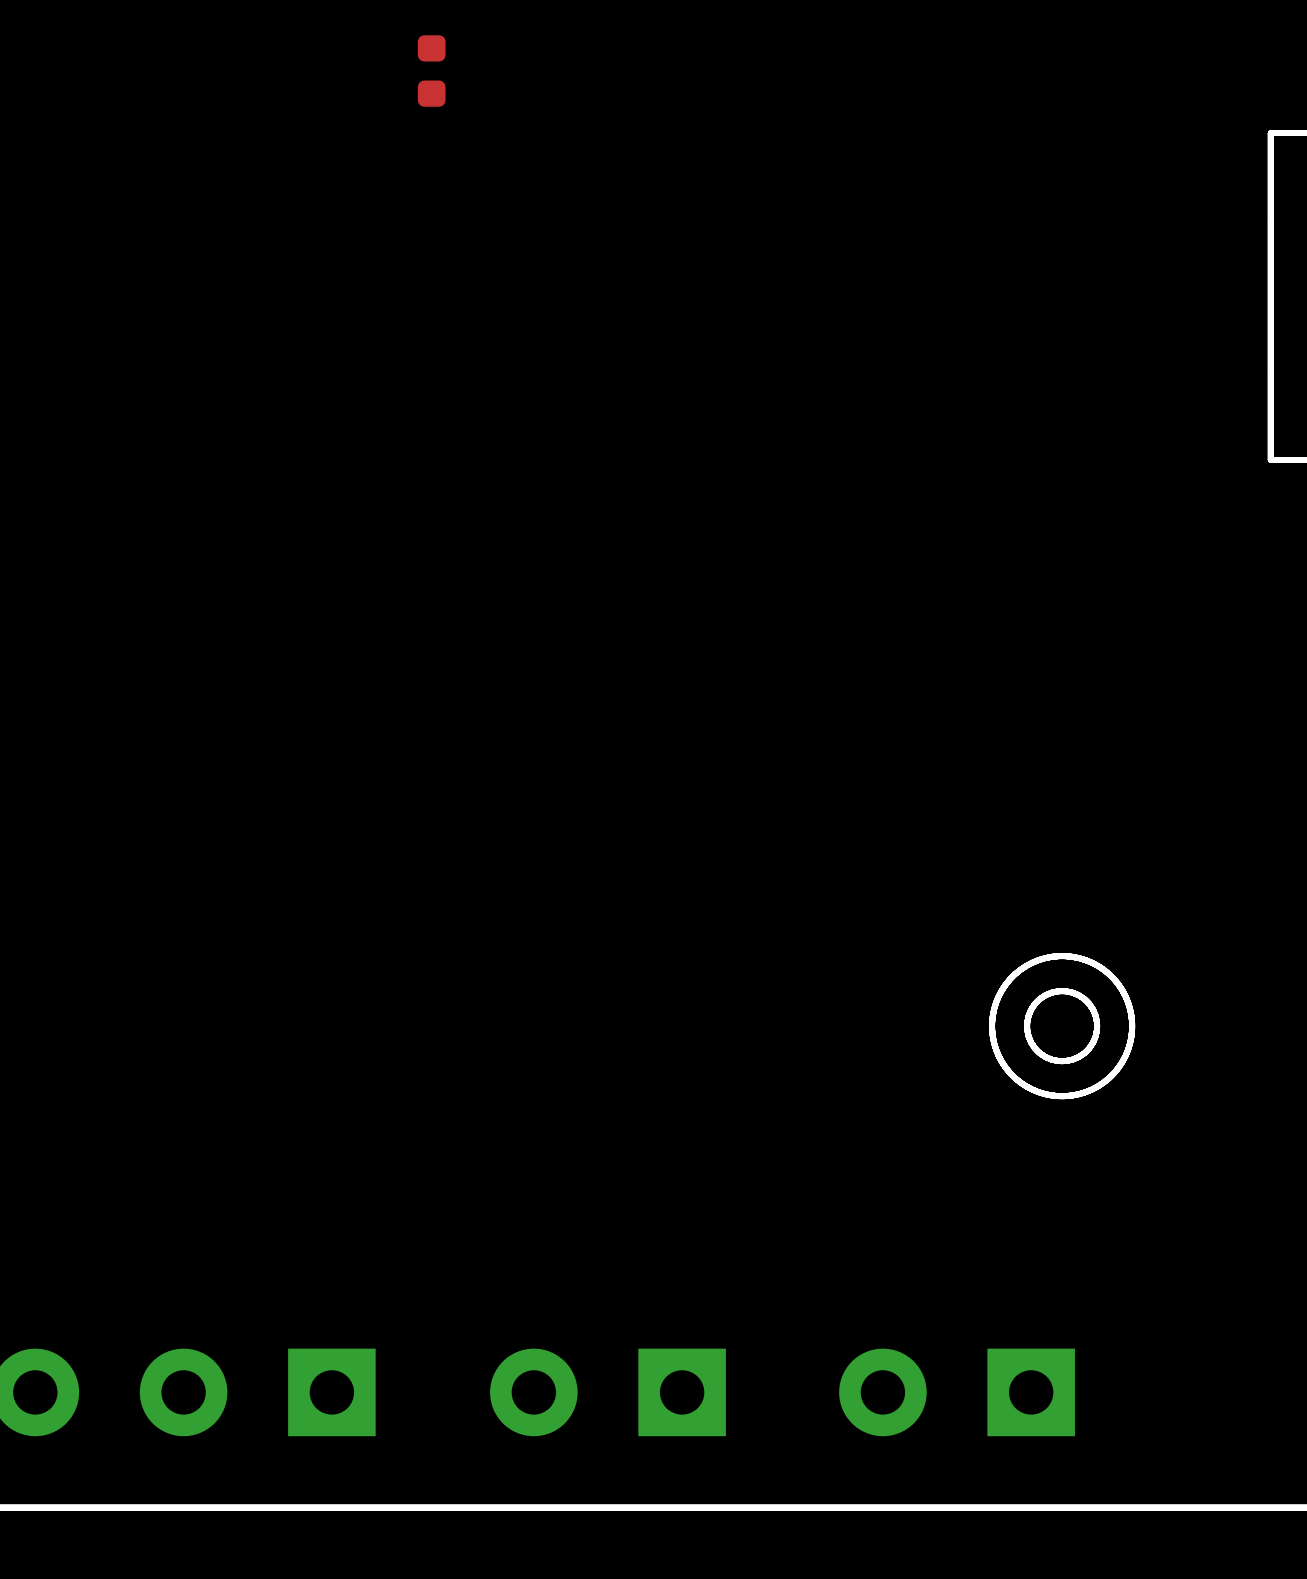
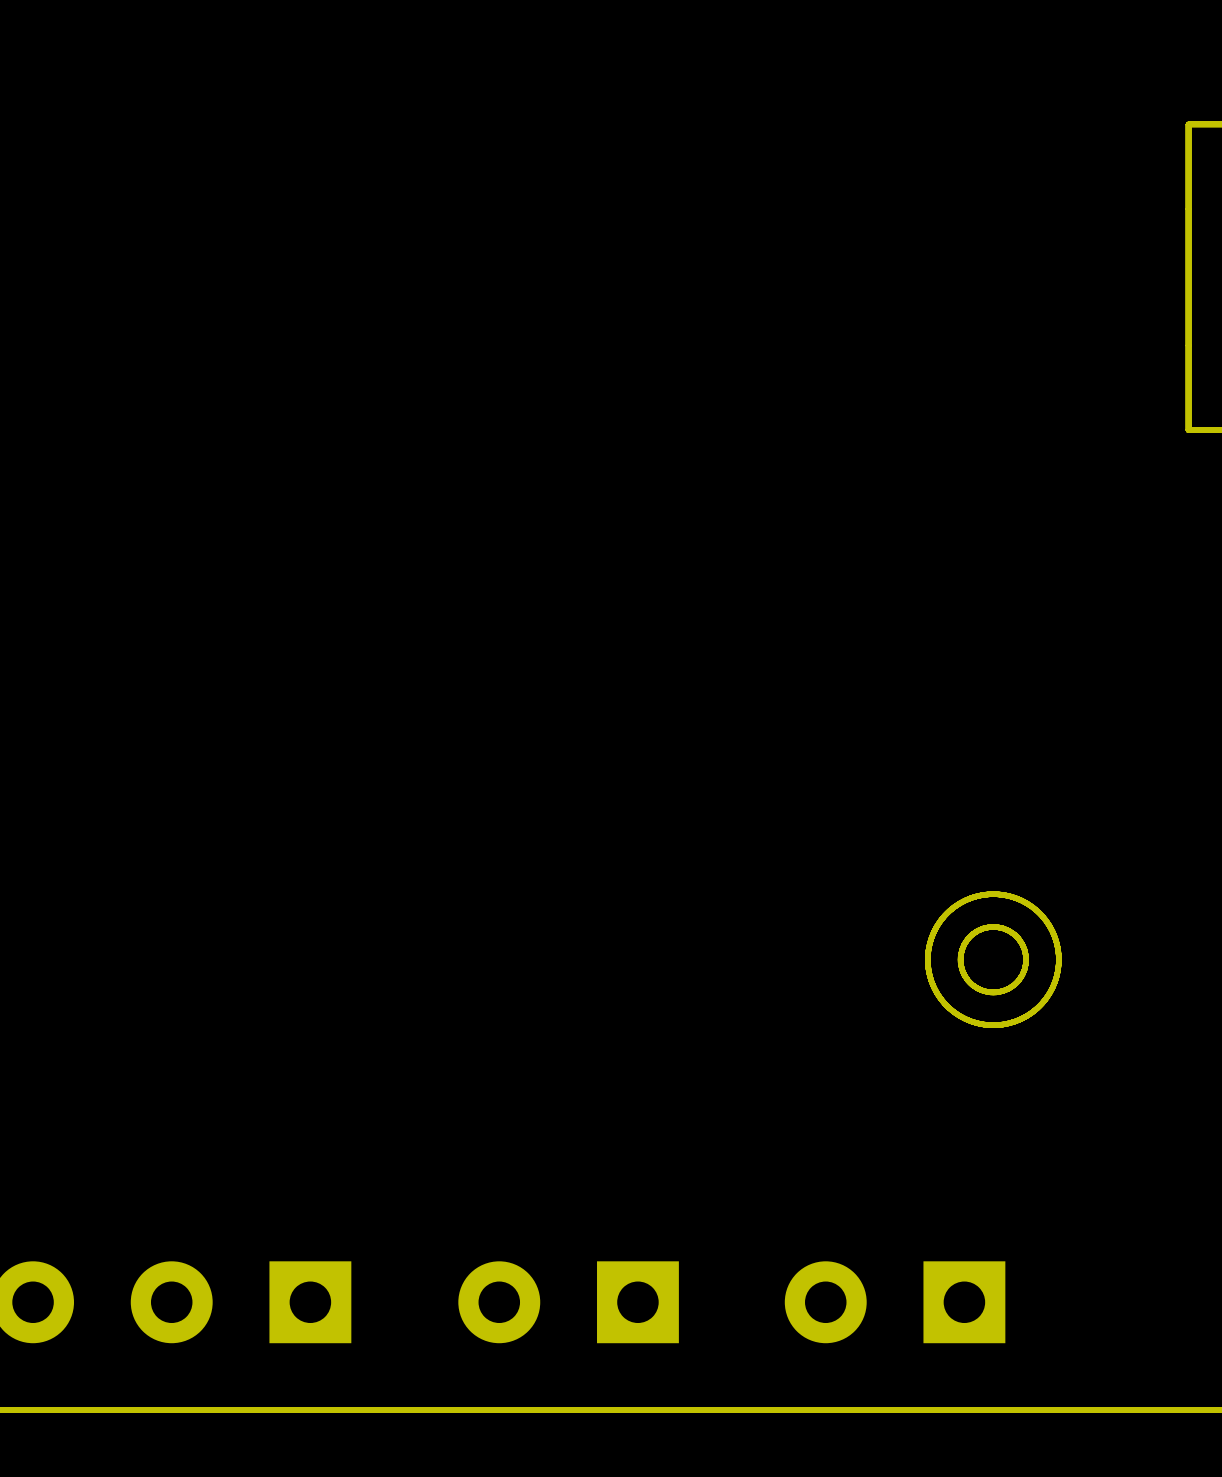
part: (431, 71) -> none

